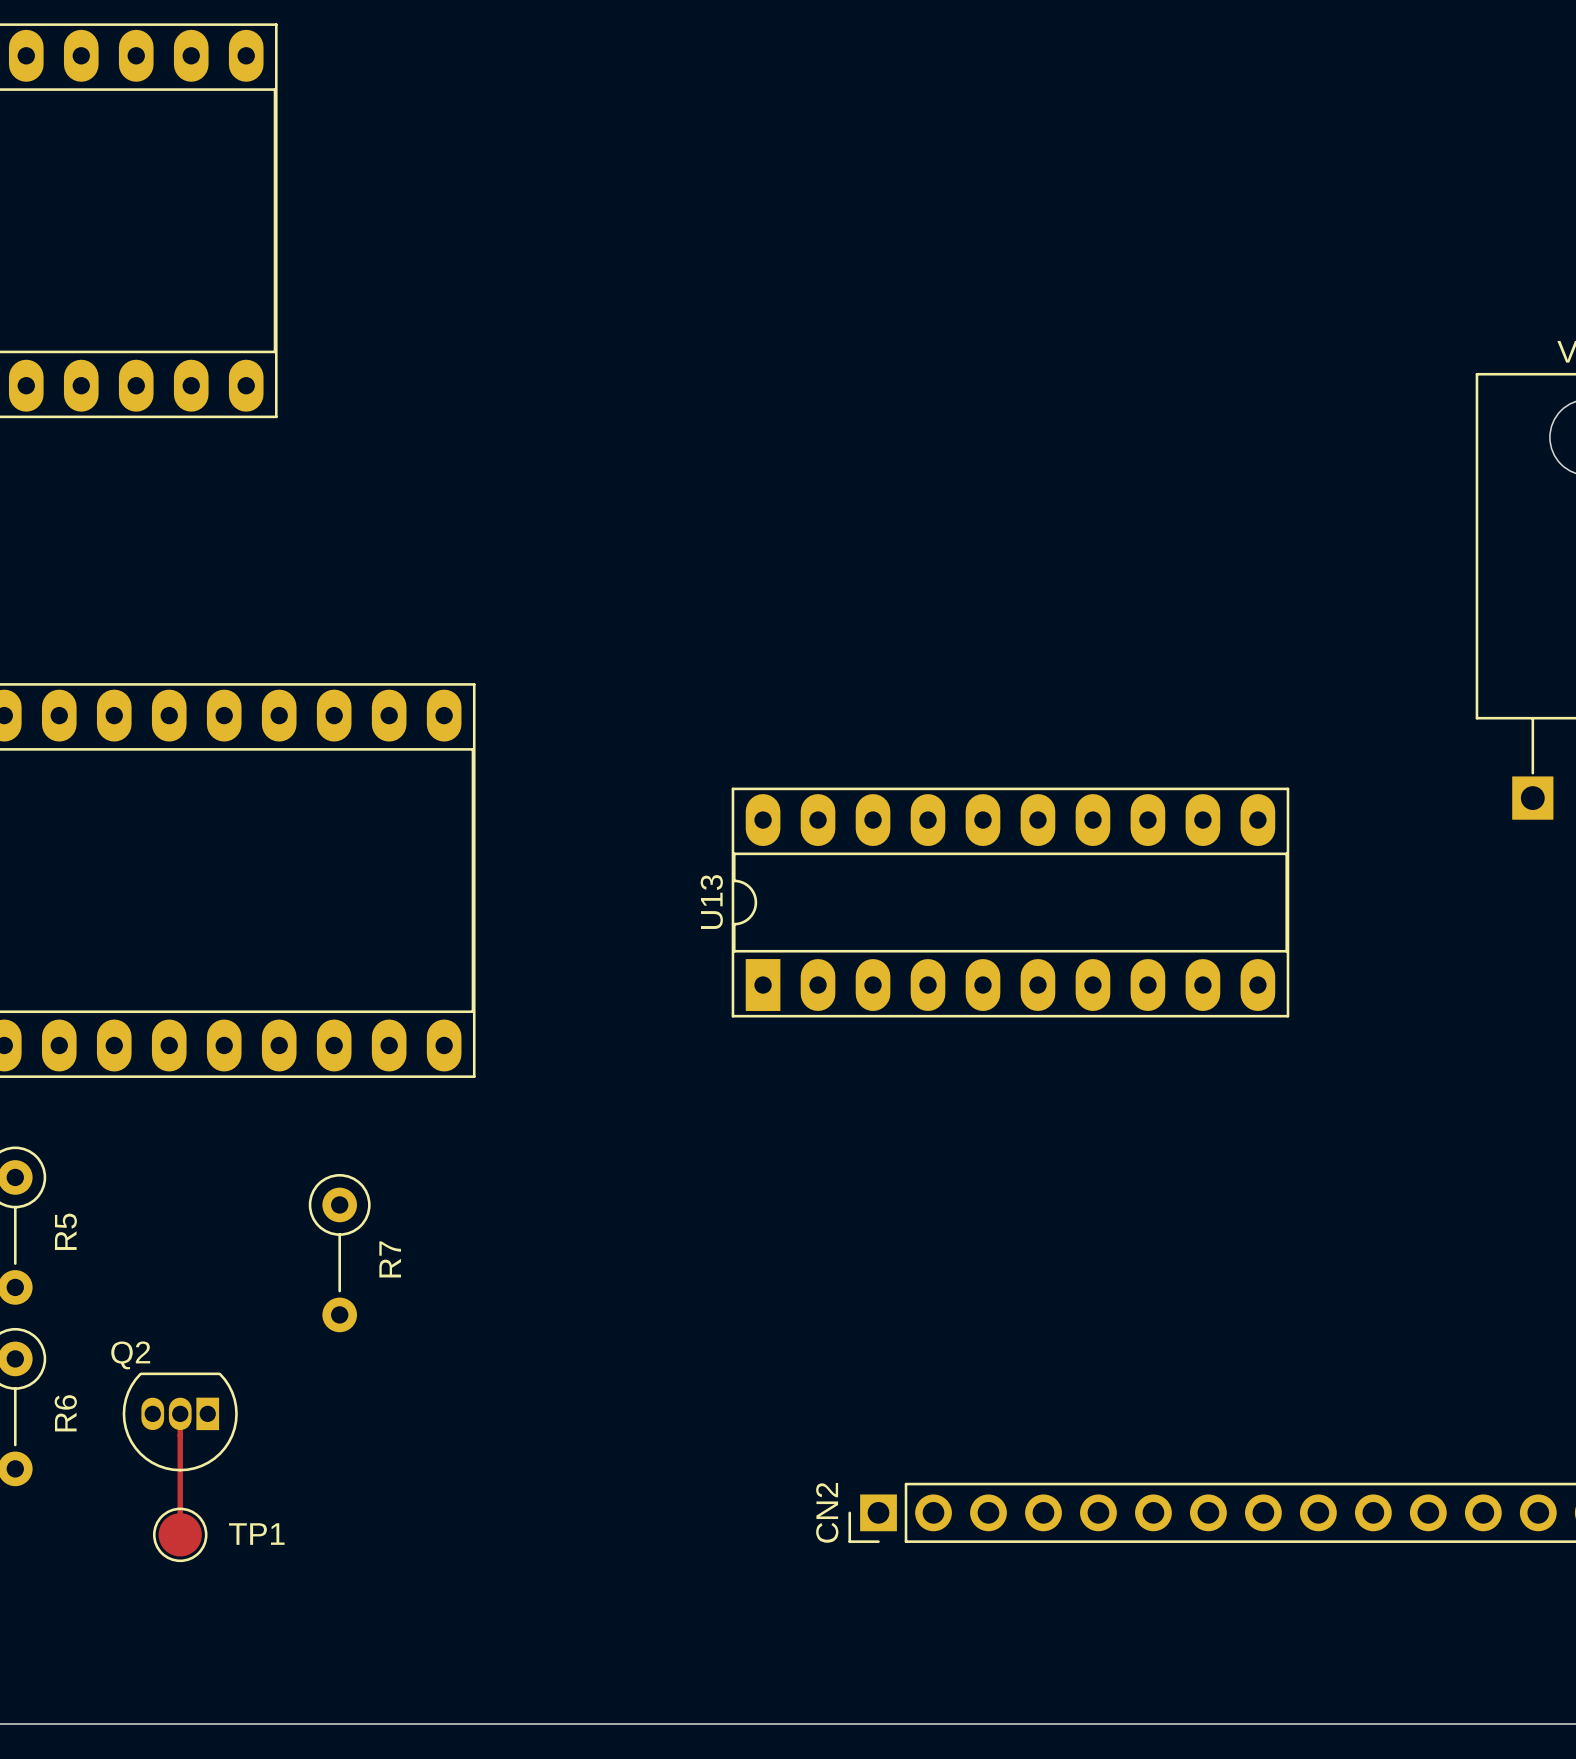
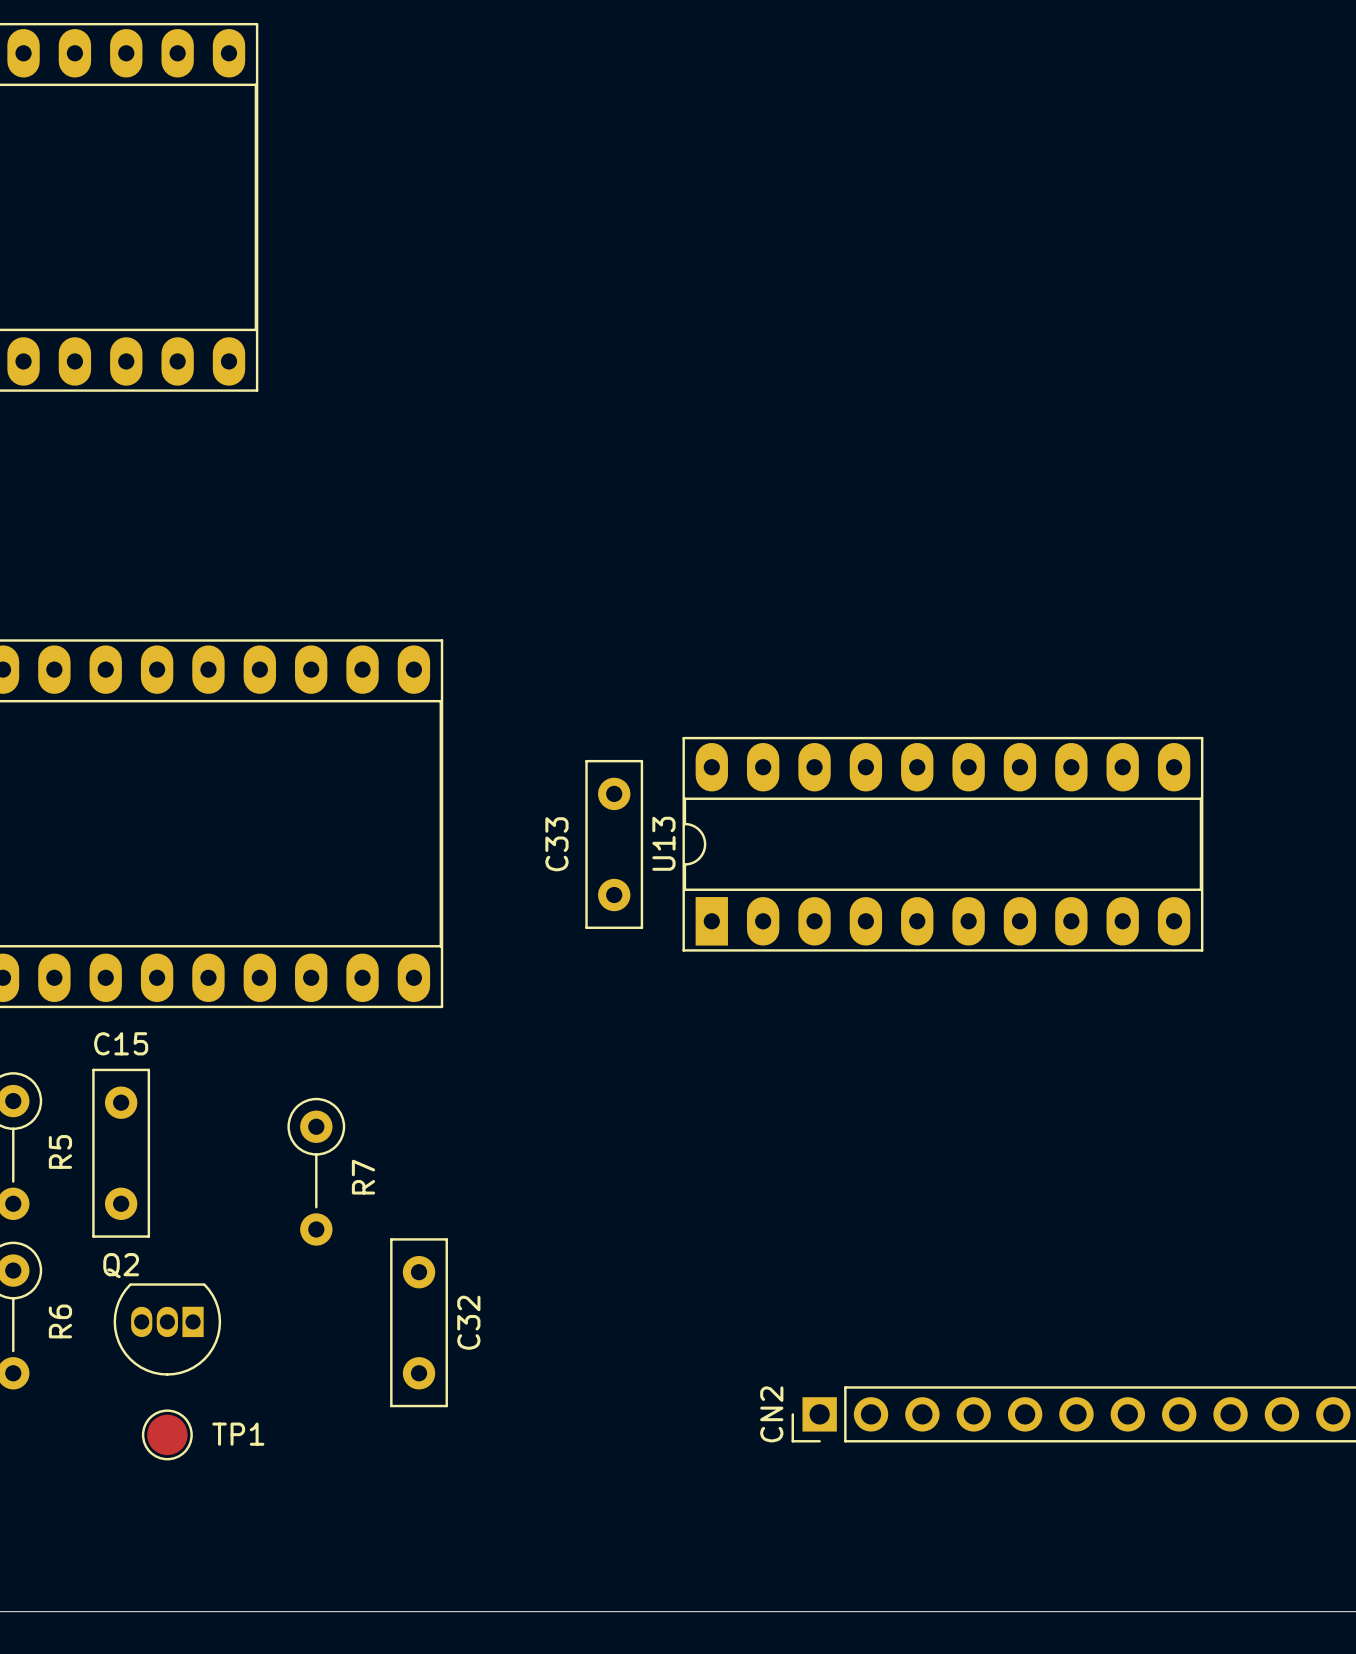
C33: none -> (614, 844)
C15: none -> (121, 1153)
top track: (180, 1413) (180, 1534) -> none
C32: none -> (419, 1322)

